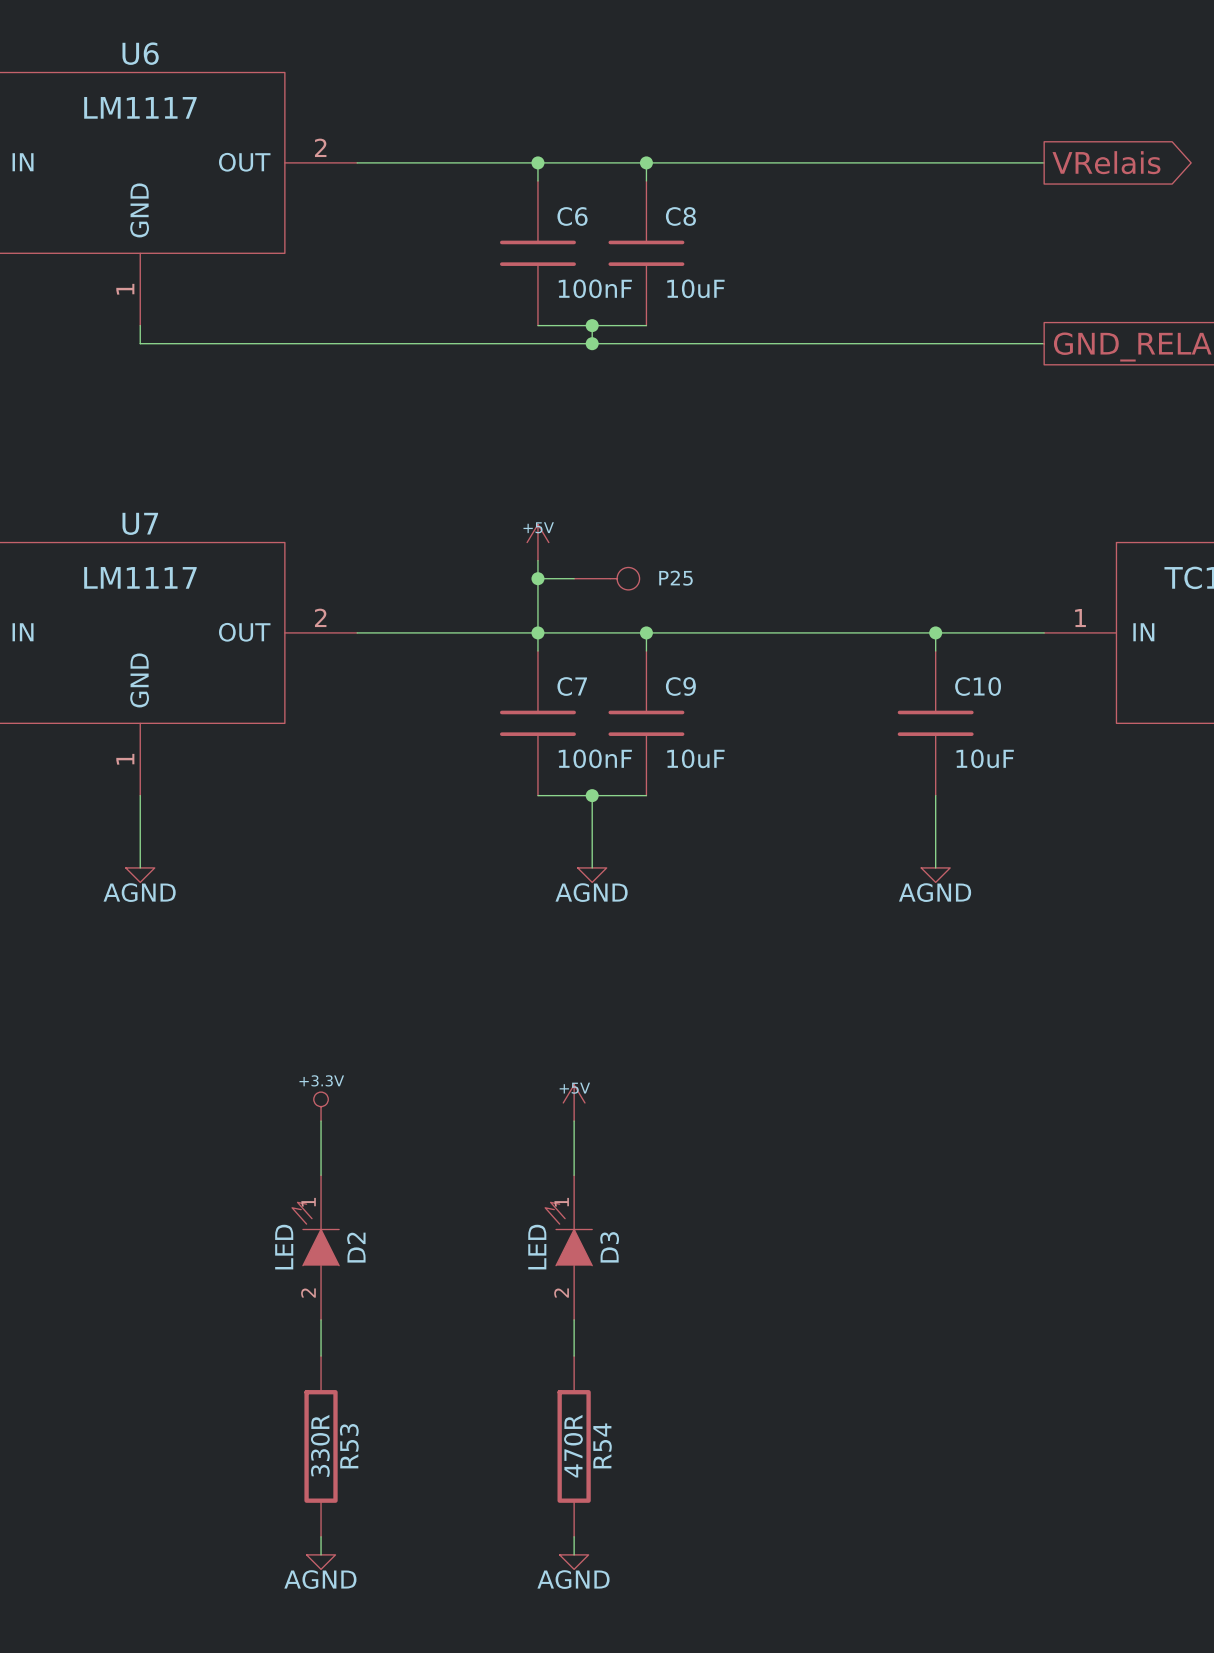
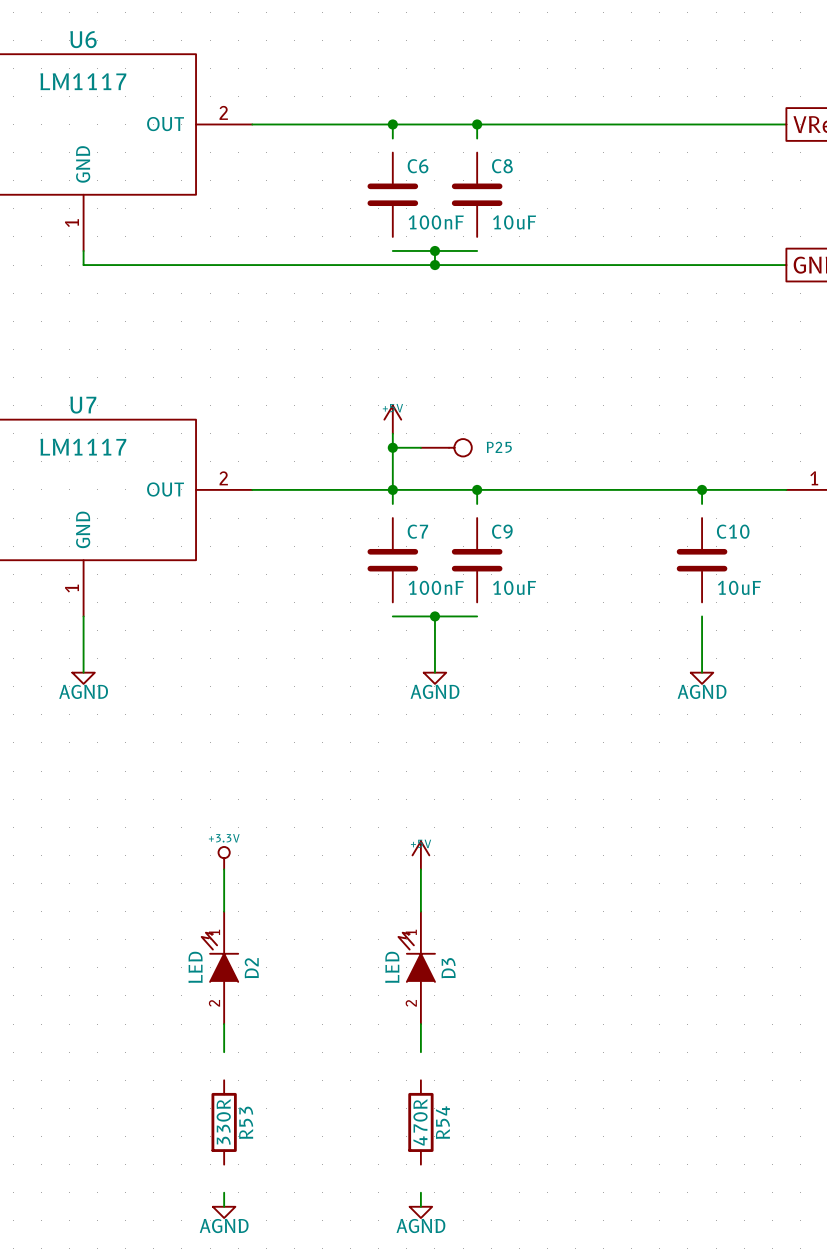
C6 symbol: [500, 180, 576, 326] -> [367, 152, 419, 237]
C8 symbol: [608, 180, 685, 326] -> [451, 152, 503, 237]
C7 symbol: [500, 651, 576, 796] -> [367, 518, 419, 603]
C9 symbol: [608, 651, 685, 796] -> [451, 518, 503, 603]
C10 symbol: [897, 651, 974, 796] -> [676, 518, 728, 603]
R53 symbol: [304, 1356, 338, 1537] -> [211, 1080, 237, 1165]
R54 symbol: [557, 1356, 591, 1537] -> [408, 1080, 434, 1165]

